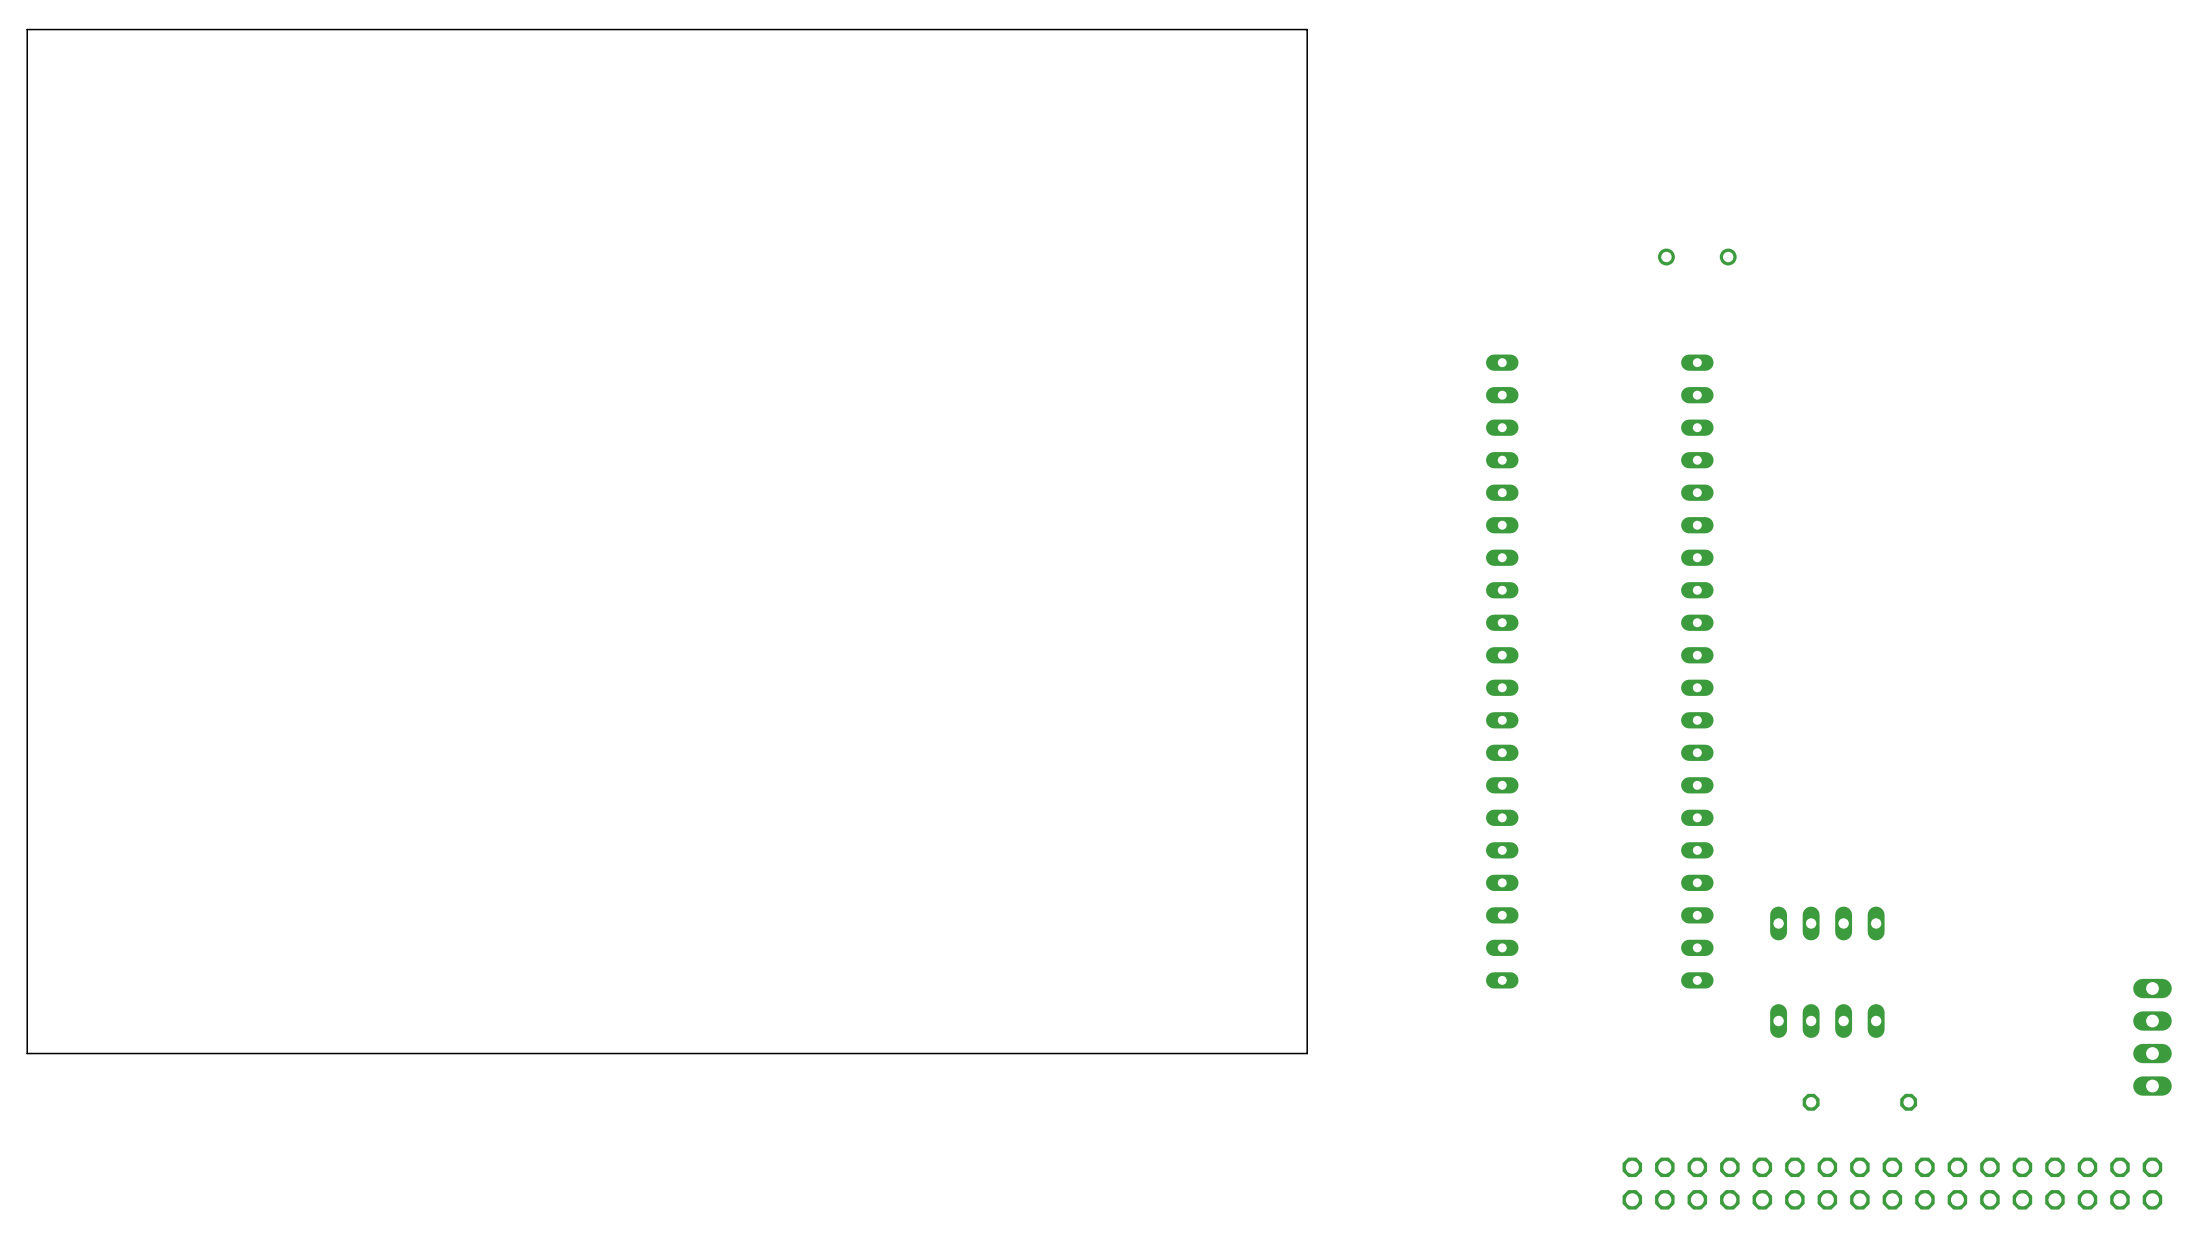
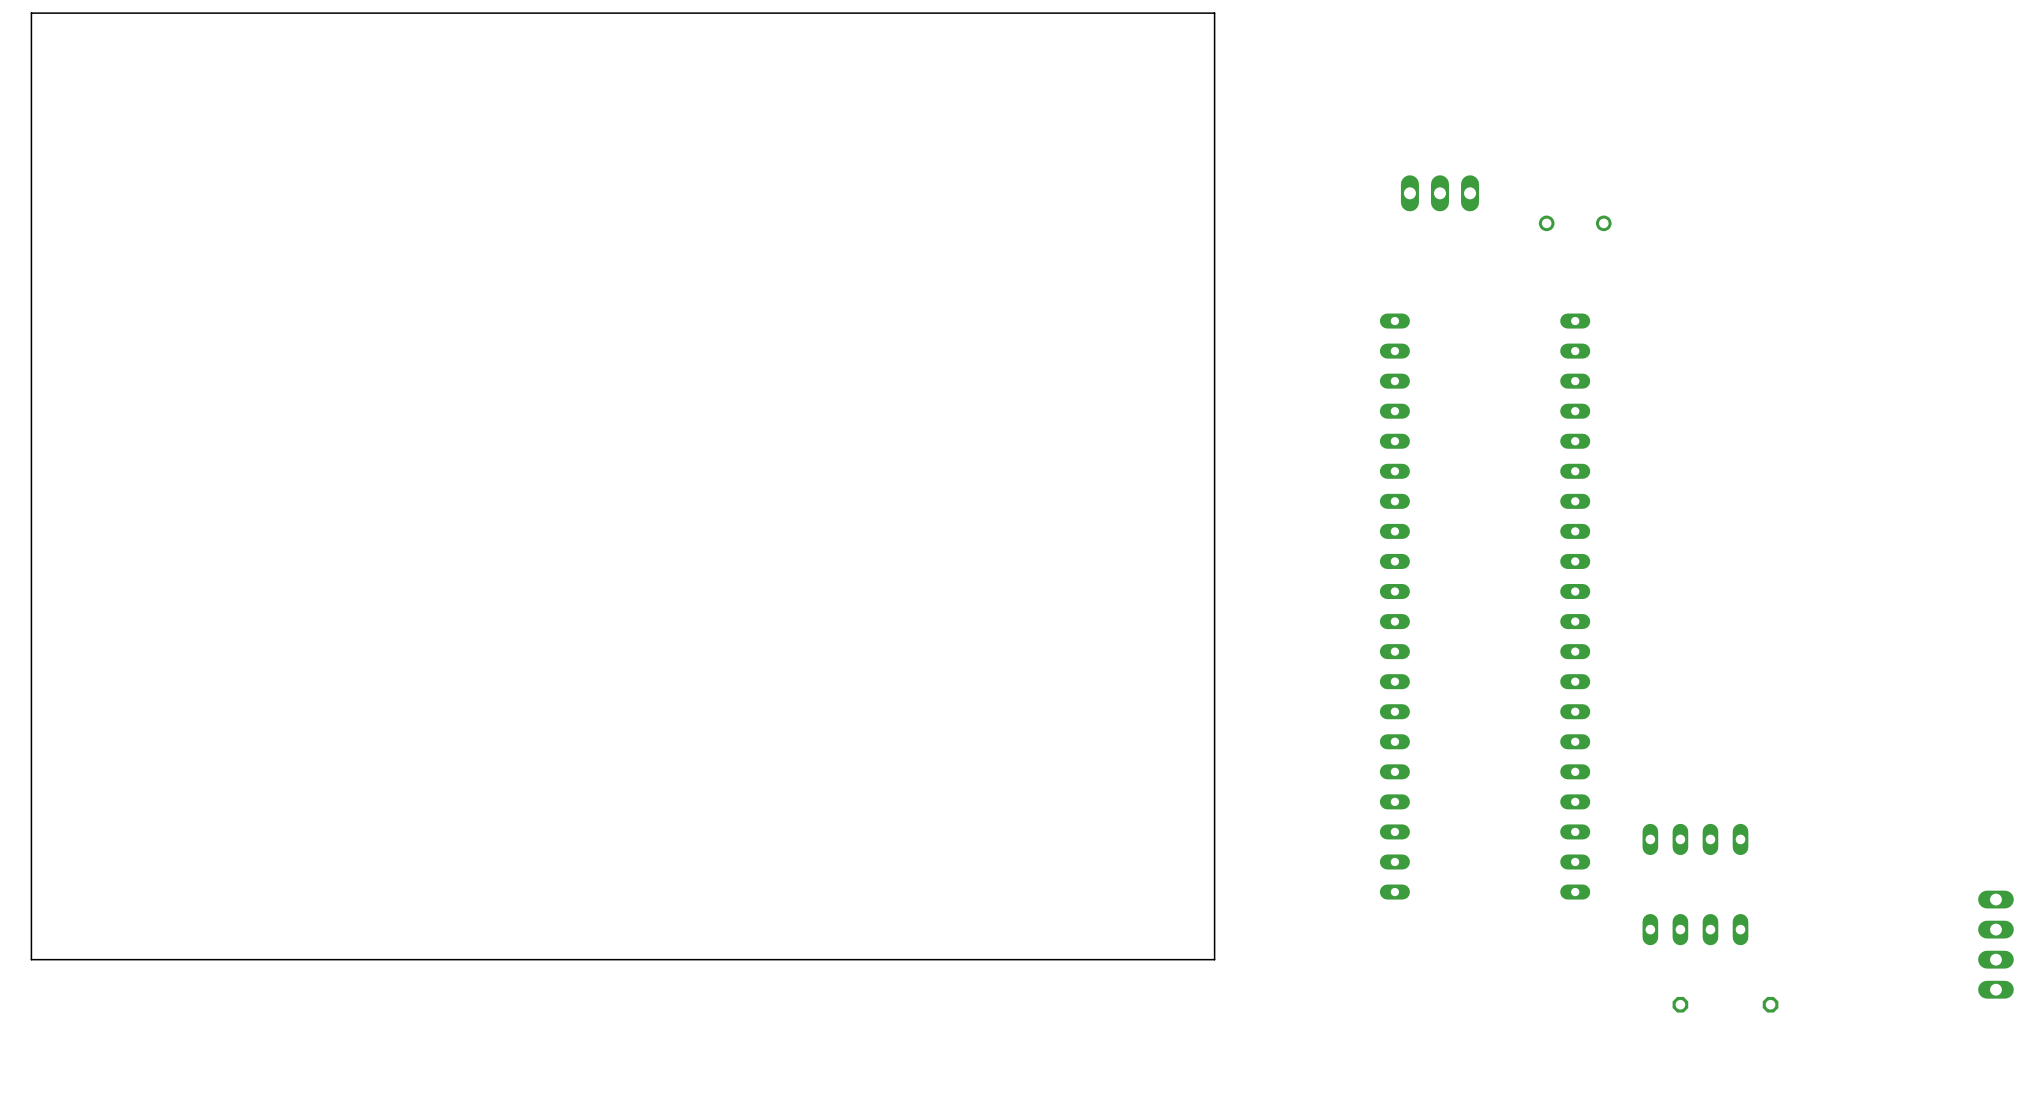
part: none -> (1439, 193)
part: (1892, 1183) -> none

